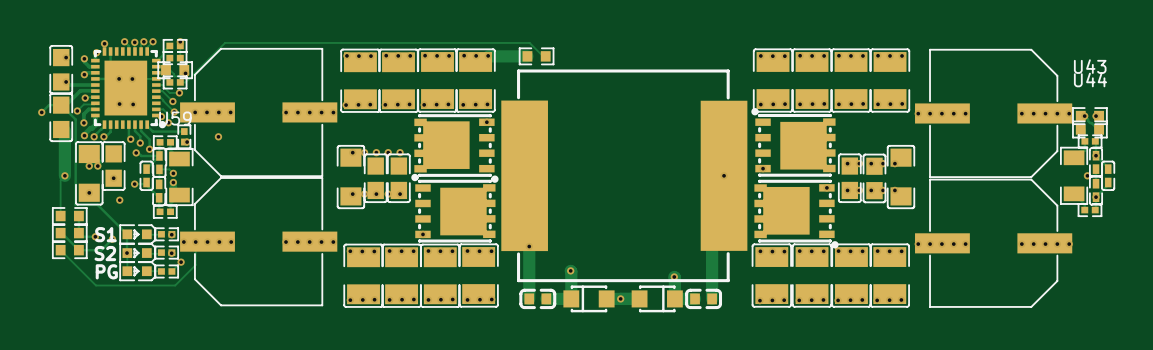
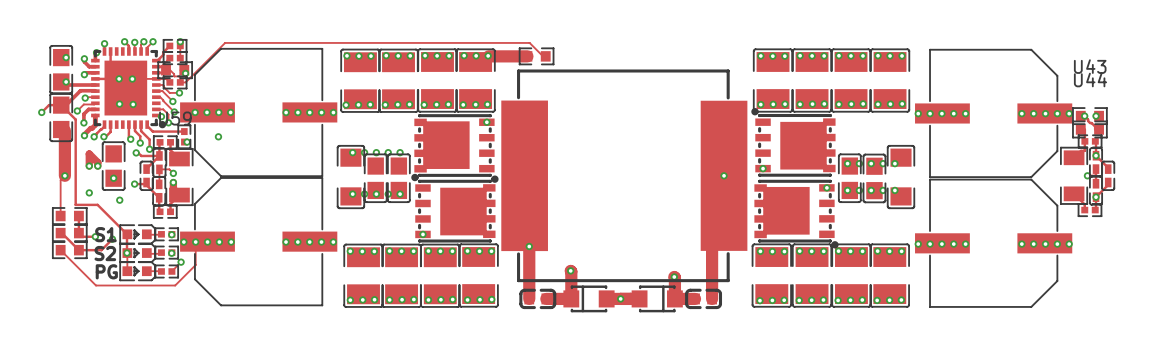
part: (89, 173) -> none

